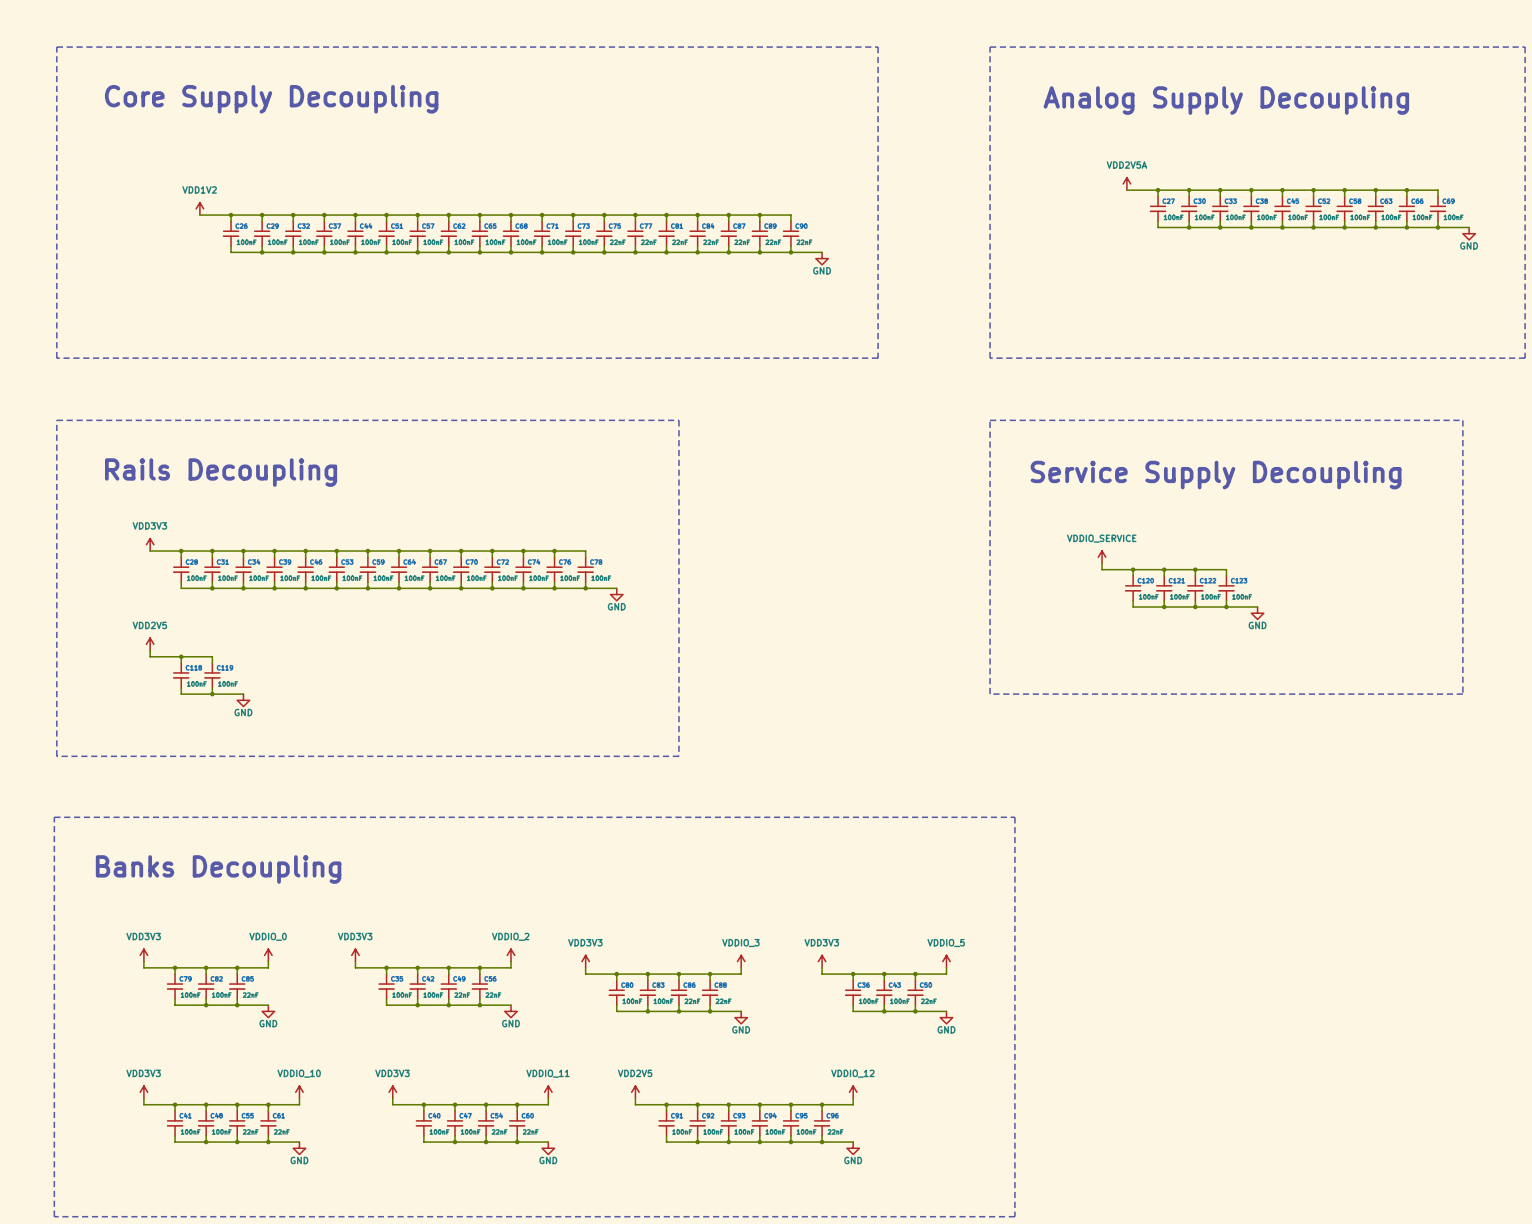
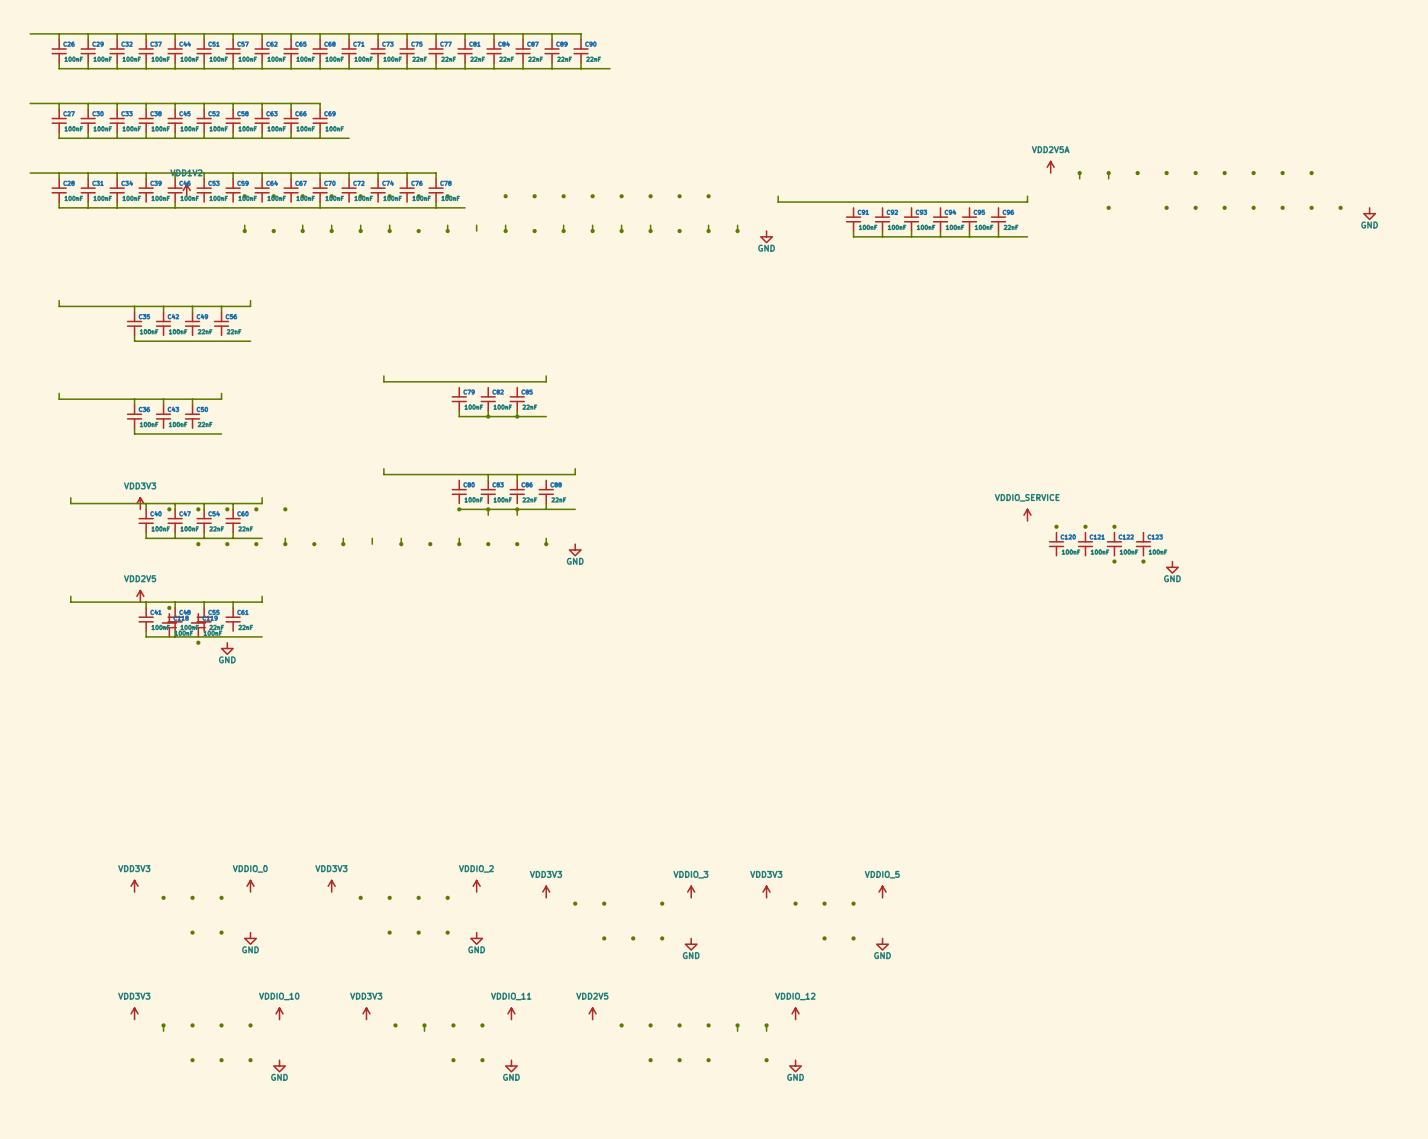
wire: none -> (30, 33) (581, 33) (581, 39)
wire: none -> (59, 33) (59, 39)
wire: none -> (88, 33) (88, 39)
wire: none -> (117, 33) (117, 39)
wire: none -> (146, 33) (146, 39)
wire: none -> (175, 33) (175, 39)
wire: none -> (204, 33) (204, 39)
wire: none -> (233, 33) (233, 39)
wire: none -> (262, 33) (262, 39)
wire: none -> (291, 33) (291, 39)
wire: none -> (320, 33) (320, 39)
wire: none -> (349, 33) (349, 39)
wire: none -> (378, 33) (378, 39)
wire: none -> (407, 33) (407, 39)
wire: none -> (436, 33) (436, 39)
wire: none -> (465, 33) (465, 39)
wire: none -> (494, 33) (494, 39)
wire: none -> (523, 33) (523, 39)
wire: none -> (552, 33) (552, 39)
line: (56, 47) (878, 47) (878, 358) (56, 358) (56, 47) -> none
line: (990, 47) (1525, 47) (1525, 358) (990, 358) (990, 47) -> none
wire: none -> (59, 62) (59, 68) (610, 68)
wire: none -> (88, 62) (88, 68)
wire: none -> (117, 62) (117, 68)
wire: none -> (146, 62) (146, 68)
wire: none -> (175, 62) (175, 68)
wire: none -> (204, 62) (204, 68)
wire: none -> (233, 62) (233, 68)
wire: none -> (262, 62) (262, 68)
wire: none -> (291, 62) (291, 68)
wire: none -> (320, 62) (320, 68)
wire: none -> (349, 62) (349, 68)
wire: none -> (378, 62) (378, 68)
wire: none -> (407, 62) (407, 68)
wire: none -> (436, 62) (436, 68)
wire: none -> (465, 62) (465, 68)
wire: none -> (494, 62) (494, 68)
wire: none -> (523, 62) (523, 68)
wire: none -> (552, 62) (552, 68)
wire: none -> (581, 62) (581, 68)
text: Core Supply Decoupling (271, 99) -> none
text: Analog Supply Decoupling (1226, 100) -> none
wire: none -> (30, 103) (320, 103) (320, 109)
wire: none -> (59, 103) (59, 109)
wire: none -> (88, 103) (88, 109)
wire: none -> (117, 103) (117, 109)
wire: none -> (146, 103) (146, 109)
wire: none -> (175, 103) (175, 109)
wire: none -> (204, 103) (204, 109)
wire: none -> (233, 103) (233, 109)
wire: none -> (262, 103) (262, 109)
wire: none -> (291, 103) (291, 109)
wire: none -> (59, 132) (59, 138) (349, 138)
wire: none -> (88, 132) (88, 138)
wire: none -> (117, 132) (117, 138)
wire: none -> (146, 132) (146, 138)
wire: none -> (175, 132) (175, 138)
wire: none -> (204, 132) (204, 138)
wire: none -> (233, 132) (233, 138)
wire: none -> (262, 132) (262, 138)
wire: none -> (291, 132) (291, 138)
wire: none -> (320, 132) (320, 138)
wire: none -> (30, 173) (436, 173) (436, 178)
wire: none -> (59, 173) (59, 178)
wire: none -> (88, 173) (88, 178)
wire: (1126, 190) (1437, 190) (1437, 196) -> none
wire: (1220, 190) (1220, 196) -> none
wire: (1251, 190) (1251, 196) -> none
wire: (1282, 190) (1282, 196) -> none
wire: (1313, 190) (1313, 196) -> none
wire: (1344, 190) (1344, 196) -> none
wire: (1375, 190) (1375, 196) -> none
wire: (1406, 190) (1406, 196) -> none
part position: (1158, 208) -> (59, 120)
part position: (1189, 208) -> (88, 120)
part position: (1220, 208) -> (117, 120)
part position: (1251, 208) -> (146, 120)
part position: (1282, 208) -> (175, 120)
part position: (1313, 208) -> (204, 120)
part position: (1344, 208) -> (233, 120)
part position: (1375, 208) -> (262, 120)
part position: (1406, 208) -> (291, 120)
part position: (1437, 208) -> (320, 120)
wire: (199, 215) (790, 215) (790, 221) -> none
junction: (231, 215) -> none
wire: (510, 215) (510, 221) -> (378, 173) (378, 178)
junction: (510, 215) -> none
wire: (542, 215) (542, 221) -> (407, 173) (407, 178)
wire: (573, 215) (573, 221) -> none
wire: (604, 215) (604, 221) -> none
wire: (635, 215) (635, 221) -> none
wire: (666, 215) (666, 221) -> none
wire: (697, 215) (697, 221) -> none
wire: (728, 215) (728, 221) -> none
wire: (759, 215) (759, 221) -> none
wire: none -> (778, 196) (778, 202) (1027, 202) (1027, 196)
wire: none -> (59, 202) (59, 207) (465, 207)
wire: none -> (88, 202) (88, 207)
wire: none -> (117, 202) (117, 207)
wire: (1158, 221) (1158, 227) (1469, 227) -> none
wire: (1189, 221) (1189, 227) -> (998, 231) (998, 236)
wire: (1220, 221) (1220, 227) -> none
wire: (1251, 221) (1251, 227) -> none
wire: (1282, 221) (1282, 227) -> none
wire: (1313, 221) (1313, 227) -> none
wire: (1344, 221) (1344, 227) -> none
wire: (1375, 221) (1375, 227) -> none
wire: (1406, 221) (1406, 227) -> none
wire: (1437, 221) (1437, 227) -> none
junction: (1220, 227) -> none
part position: (231, 233) -> (59, 51)
part position: (262, 233) -> (88, 51)
part position: (293, 233) -> (117, 51)
part position: (324, 233) -> (146, 51)
part position: (355, 233) -> (175, 51)
part position: (386, 233) -> (204, 51)
part position: (417, 233) -> (233, 51)
part position: (448, 233) -> (262, 51)
part position: (479, 233) -> (291, 51)
part position: (510, 233) -> (320, 51)
part position: (542, 233) -> (349, 51)
part position: (573, 233) -> (378, 51)
part position: (604, 233) -> (407, 51)
part position: (635, 233) -> (436, 51)
part position: (666, 233) -> (465, 51)
part position: (697, 233) -> (494, 51)
part position: (728, 233) -> (523, 51)
part position: (759, 233) -> (552, 51)
part position: (790, 233) -> (581, 51)
wire: (231, 246) (231, 252) (822, 252) -> none
wire: (293, 246) (293, 252) -> (175, 202) (175, 207)
wire: (448, 246) (448, 252) -> (320, 202) (320, 207)
wire: (573, 246) (573, 252) -> (436, 202) (436, 207)
wire: (728, 246) (728, 252) -> none
junction: (510, 252) -> none
wire: none -> (853, 231) (853, 236) (1027, 236)
wire: none -> (882, 231) (882, 236)
wire: none -> (911, 231) (911, 236)
wire: none -> (940, 231) (940, 236)
wire: none -> (969, 231) (969, 236)
wire: none -> (59, 300) (59, 306) (250, 306) (250, 300)
wire: none -> (134, 306) (134, 312)
wire: none -> (163, 306) (163, 312)
wire: none -> (192, 306) (192, 312)
wire: none -> (221, 306) (221, 312)
wire: none -> (134, 335) (134, 341) (250, 341)
wire: none -> (383, 375) (383, 381) (546, 381) (546, 375)
line: (56, 420) (678, 420) (678, 756) (56, 756) (56, 420) -> none
line: (990, 420) (990, 694) (1462, 694) (1462, 420) (990, 420) -> none
wire: none -> (59, 393) (59, 399) (221, 399) (221, 393)
wire: none -> (134, 399) (134, 404)
wire: none -> (163, 399) (163, 404)
wire: none -> (192, 399) (192, 404)
wire: none -> (459, 410) (459, 416) (546, 416)
wire: none -> (488, 410) (488, 416)
junction: none -> (488, 416)
junction: none -> (517, 416)
wire: none -> (134, 428) (134, 433) (221, 433)
text: Rails Decoupling (221, 472) -> none
text: Service Supply Decoupling (1216, 475) -> none
wire: none -> (383, 468) (383, 474) (575, 474) (575, 468)
wire: none -> (70, 497) (70, 503) (262, 503) (262, 497)
wire: none -> (546, 503) (546, 509) (575, 509)
wire: (150, 551) (492, 551) (492, 557) -> none
wire: (181, 551) (181, 557) -> (146, 503) (146, 509)
wire: (212, 551) (212, 557) -> (175, 503) (175, 509)
wire: (243, 551) (243, 557) -> (204, 503) (204, 509)
wire: (274, 551) (274, 557) -> (233, 503) (233, 509)
wire: (305, 551) (305, 557) -> (233, 602) (233, 607)
wire: (336, 551) (336, 557) -> none
junction: (336, 551) -> none
wire: (367, 551) (367, 557) -> none
junction: (367, 551) -> none
wire: (399, 551) (399, 557) -> none
junction: (399, 551) -> none
wire: (430, 551) (430, 557) -> none
junction: (430, 551) -> none
wire: (461, 551) (461, 557) -> none
junction: (461, 551) -> none
wire: (585, 551) (585, 557) -> (517, 410) (517, 416)
wire: (1102, 563) (1102, 569) (1226, 569) (1226, 575) -> none
part position: (181, 569) -> (59, 190)
part position: (212, 569) -> (88, 190)
part position: (243, 569) -> (117, 190)
part position: (274, 569) -> (146, 190)
part position: (305, 569) -> (175, 190)
part position: (336, 569) -> (204, 190)
part position: (367, 569) -> (233, 190)
part position: (399, 569) -> (262, 190)
part position: (430, 569) -> (291, 190)
part position: (461, 569) -> (320, 190)
part position: (492, 569) -> (349, 190)
part position: (523, 569) -> (378, 190)
part position: (554, 569) -> (407, 190)
part position: (585, 569) -> (436, 190)
wire: (1133, 569) (1133, 575) -> none
wire: (1164, 569) (1164, 575) -> none
wire: (1195, 569) (1195, 575) -> none
wire: none -> (146, 532) (146, 538) (262, 538)
wire: (181, 582) (181, 588) (616, 588) -> none
wire: (336, 582) (336, 588) -> none
wire: (461, 582) (461, 588) -> none
wire: (523, 582) (523, 588) -> (488, 474) (488, 480)
wire: (554, 582) (554, 588) -> (517, 474) (517, 480)
junction: (399, 588) -> none
wire: (1133, 600) (1133, 607) (1257, 607) -> none
wire: (1164, 600) (1164, 607) -> none
wire: (1195, 600) (1195, 607) -> none
wire: (1226, 600) (1226, 607) -> none
junction: (1164, 607) -> none
wire: none -> (70, 596) (70, 602) (262, 602) (262, 596)
wire: (150, 650) (150, 656) (212, 656) (212, 663) -> none
wire: none -> (175, 602) (175, 607)
wire: none -> (204, 602) (204, 607)
wire: (181, 656) (181, 663) -> (146, 602) (146, 607)
wire: none -> (146, 631) (146, 636) (262, 636)
wire: (181, 687) (181, 694) (243, 694) -> none
line: (54, 817) (1014, 817) (1014, 1216) (54, 1216) (54, 817) -> none
text: Banks Decoupling (218, 869) -> none
wire: (143, 961) (143, 967) (268, 967) (268, 961) -> none
wire: (355, 961) (355, 967) (510, 967) (510, 961) -> none
wire: (175, 967) (175, 974) -> none
wire: (206, 967) (206, 974) -> none
wire: (237, 967) (237, 974) -> none
wire: (386, 967) (386, 974) -> none
wire: (417, 967) (417, 974) -> none
wire: (448, 967) (448, 974) -> none
wire: (479, 967) (479, 974) -> none
wire: (585, 967) (585, 974) (741, 974) (741, 967) -> none
wire: (822, 967) (822, 974) (946, 974) (946, 967) -> none
wire: (616, 974) (616, 980) -> none
wire: (647, 974) (647, 980) -> none
wire: (678, 974) (678, 980) -> none
junction: (678, 974) -> none
wire: (710, 974) (710, 980) -> none
wire: (853, 974) (853, 980) -> none
wire: (884, 974) (884, 980) -> none
wire: (915, 974) (915, 980) -> none
part position: (175, 986) -> (459, 399)
part position: (206, 986) -> (488, 399)
part position: (237, 986) -> (517, 399)
part position: (386, 986) -> (134, 323)
part position: (417, 986) -> (163, 323)
part position: (448, 986) -> (192, 323)
part position: (479, 986) -> (221, 323)
part position: (616, 992) -> (459, 491)
part position: (647, 992) -> (488, 491)
part position: (678, 992) -> (517, 491)
part position: (710, 992) -> (546, 491)
part position: (853, 992) -> (134, 416)
part position: (884, 992) -> (163, 416)
part position: (915, 992) -> (192, 416)
wire: (175, 998) (175, 1005) (268, 1005) -> none
wire: (206, 998) (206, 1005) -> none
wire: (237, 998) (237, 1005) -> none
wire: (386, 998) (386, 1005) (510, 1005) -> none
wire: (417, 998) (417, 1005) -> none
wire: (448, 998) (448, 1005) -> none
wire: (479, 998) (479, 1005) -> none
wire: (616, 1005) (616, 1011) (741, 1011) -> none
wire: (647, 1005) (647, 1011) -> none
wire: (678, 1005) (678, 1011) -> none
wire: (710, 1005) (710, 1011) -> none
wire: (853, 1005) (853, 1011) (946, 1011) -> none
wire: (884, 1005) (884, 1011) -> none
wire: (915, 1005) (915, 1011) -> none
wire: (143, 1098) (143, 1104) (299, 1104) (299, 1098) -> none
wire: (392, 1098) (392, 1104) (548, 1104) (548, 1098) -> none
wire: (635, 1098) (635, 1104) (853, 1104) (853, 1098) -> none
wire: (206, 1104) (206, 1110) -> none
wire: (237, 1104) (237, 1110) -> none
wire: (268, 1104) (268, 1110) -> none
wire: (423, 1104) (423, 1110) -> none
wire: (486, 1104) (486, 1110) -> none
wire: (517, 1104) (517, 1110) -> none
wire: (666, 1104) (666, 1110) -> none
wire: (697, 1104) (697, 1110) -> none
wire: (728, 1104) (728, 1110) -> none
wire: (759, 1104) (759, 1110) -> none
part position: (175, 1123) -> (146, 619)
part position: (206, 1123) -> (175, 619)
part position: (237, 1123) -> (204, 619)
part position: (268, 1123) -> (233, 619)
part position: (423, 1123) -> (146, 520)
part position: (455, 1123) -> (175, 520)
part position: (486, 1123) -> (204, 520)
part position: (517, 1123) -> (233, 520)
part position: (666, 1123) -> (853, 219)
part position: (697, 1123) -> (882, 219)
part position: (728, 1123) -> (911, 219)
part position: (759, 1123) -> (940, 219)
part position: (790, 1123) -> (969, 219)
part position: (822, 1123) -> (998, 219)
wire: (175, 1135) (175, 1142) (299, 1142) -> none
wire: (206, 1135) (206, 1142) -> none
wire: (237, 1135) (237, 1142) -> none
wire: (268, 1135) (268, 1142) -> none
wire: (423, 1135) (423, 1142) (548, 1142) -> none
wire: (455, 1135) (455, 1142) -> none
wire: (486, 1135) (486, 1142) -> none
wire: (517, 1135) (517, 1142) -> none
wire: (666, 1135) (666, 1142) (853, 1142) -> none
wire: (697, 1135) (697, 1142) -> none
wire: (728, 1135) (728, 1142) -> none
wire: (759, 1135) (759, 1142) -> none
wire: (790, 1135) (790, 1142) -> none
wire: (822, 1135) (822, 1142) -> none
junction: (455, 1142) -> none
junction: (790, 1142) -> none

